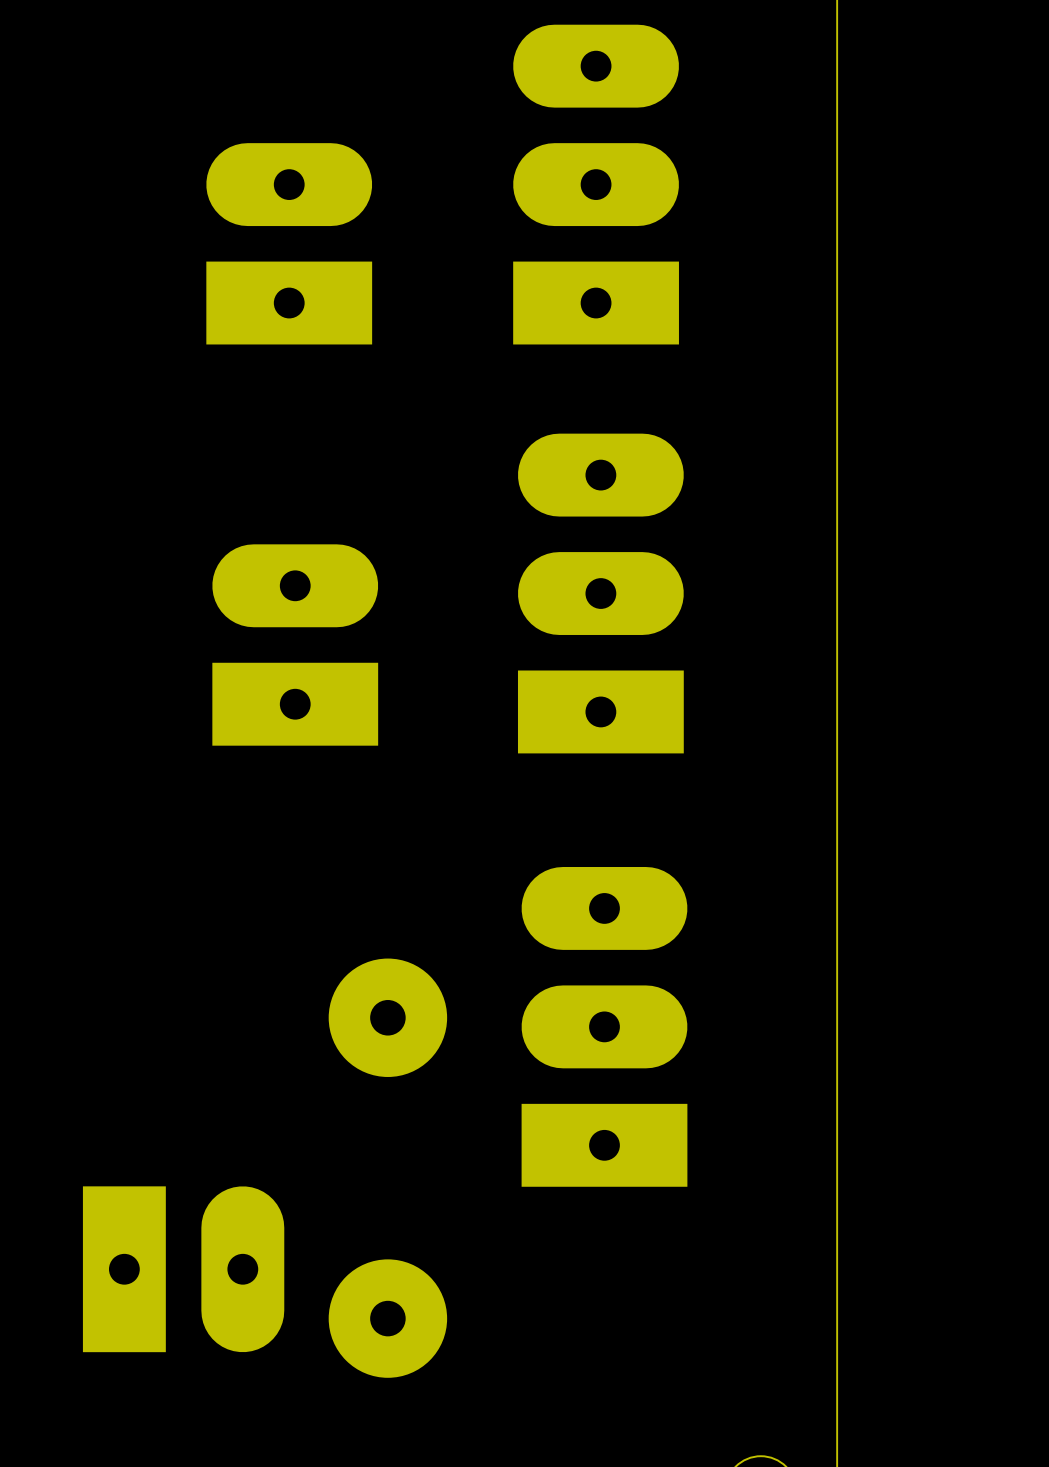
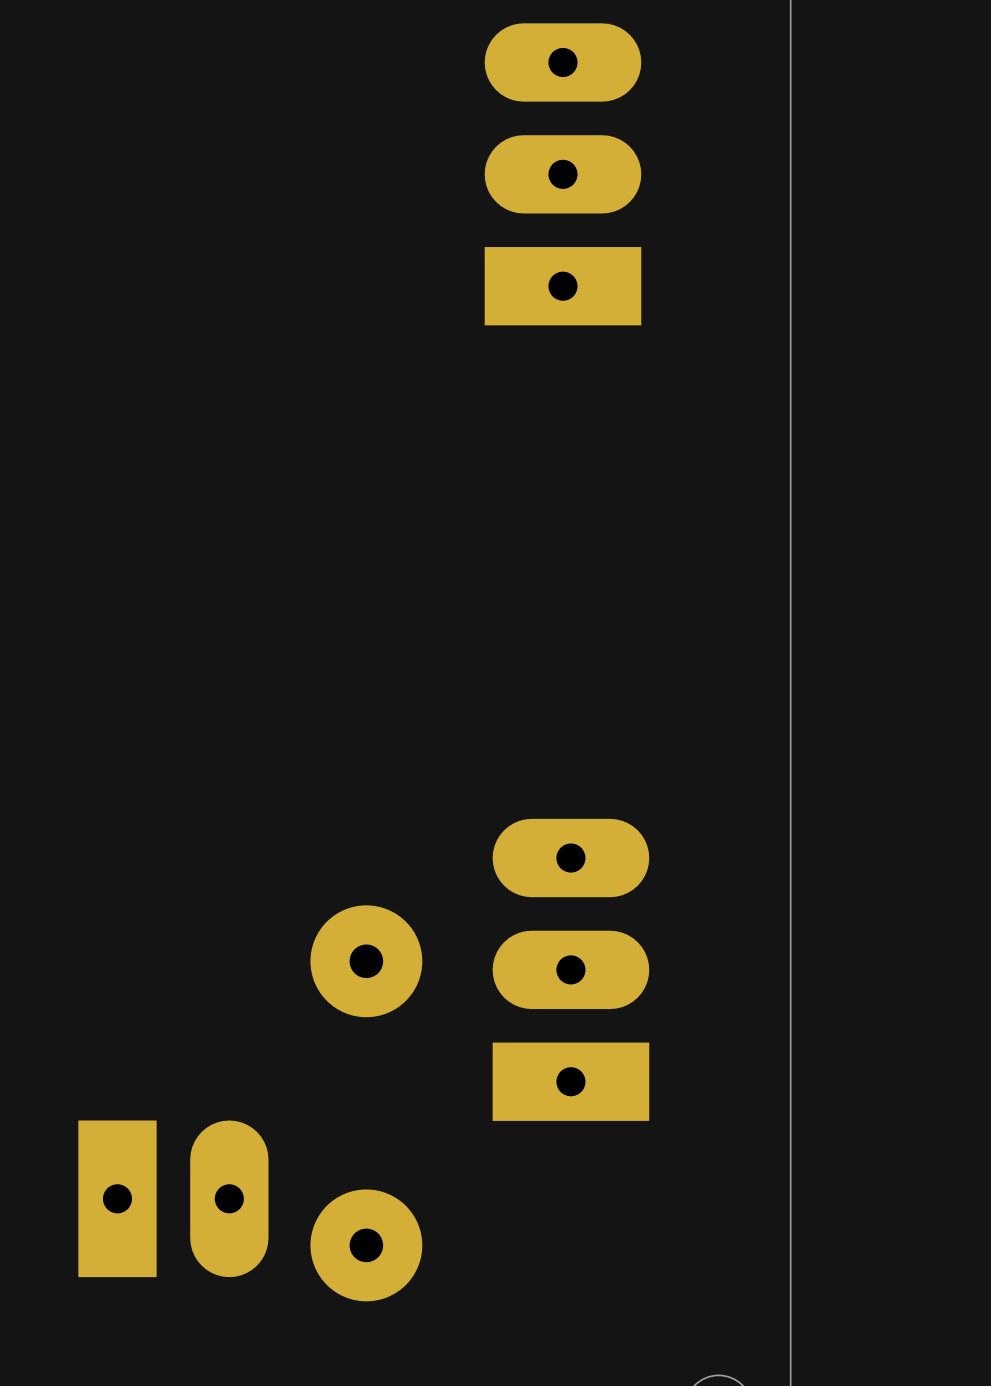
part: (289, 243) -> none
part: (600, 593) -> none
part: (295, 645) -> none

